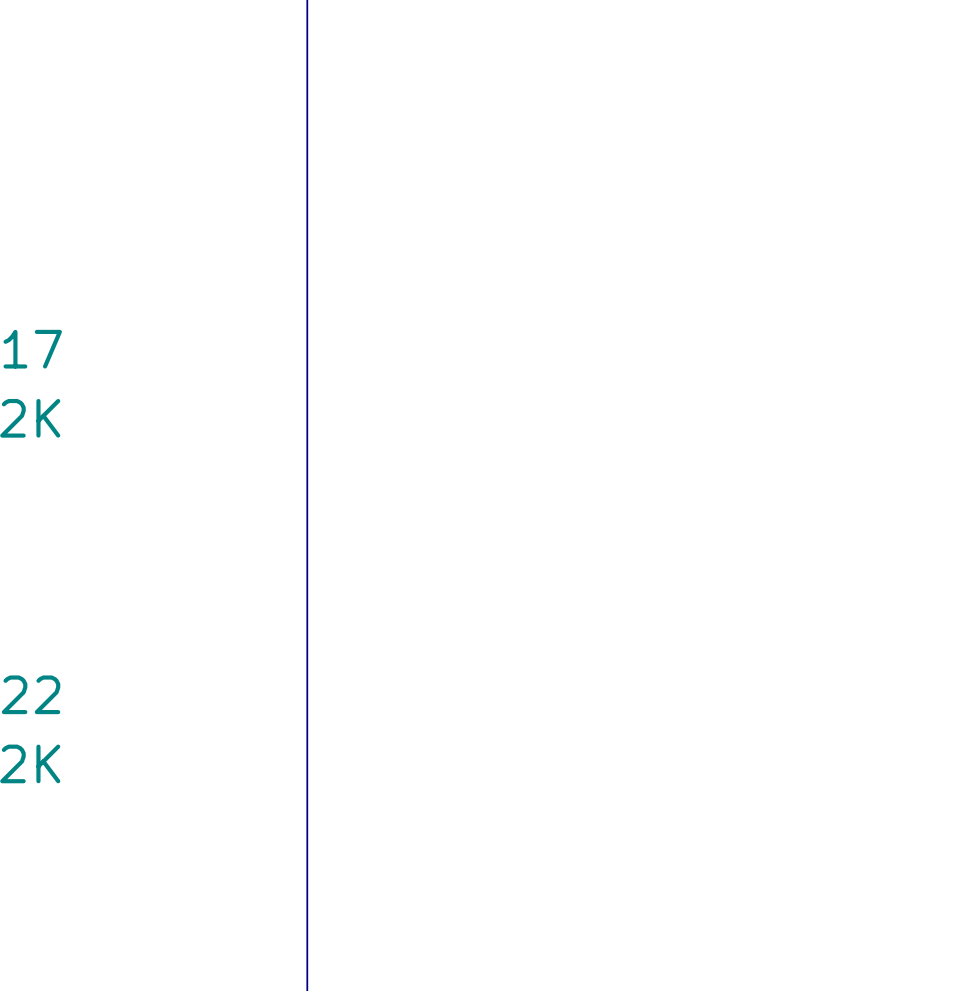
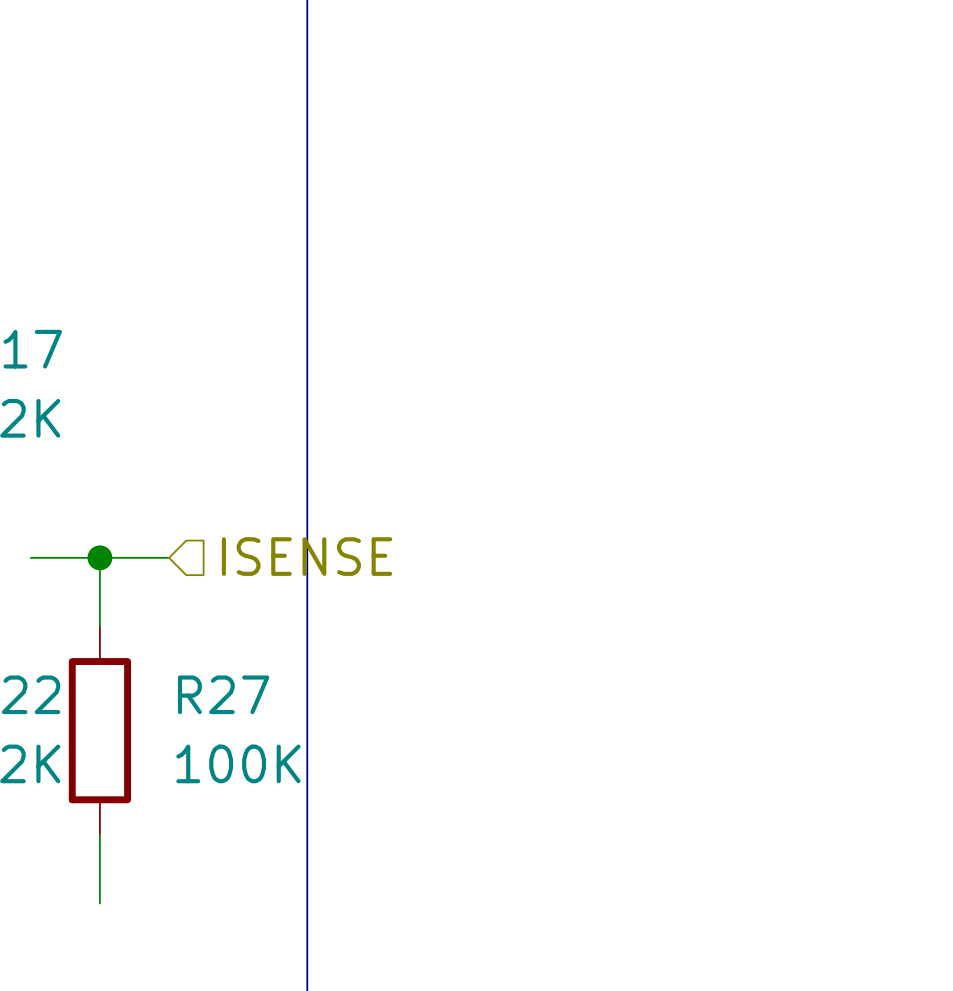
hierarchical label: none -> ISENSE (307, 556)
wire: none -> (30, 557) (169, 557)
wire: none -> (99, 557) (99, 626)
junction: none -> (99, 557)
R27: none -> 100K (99, 730)
wire: none -> (99, 834) (99, 903)

